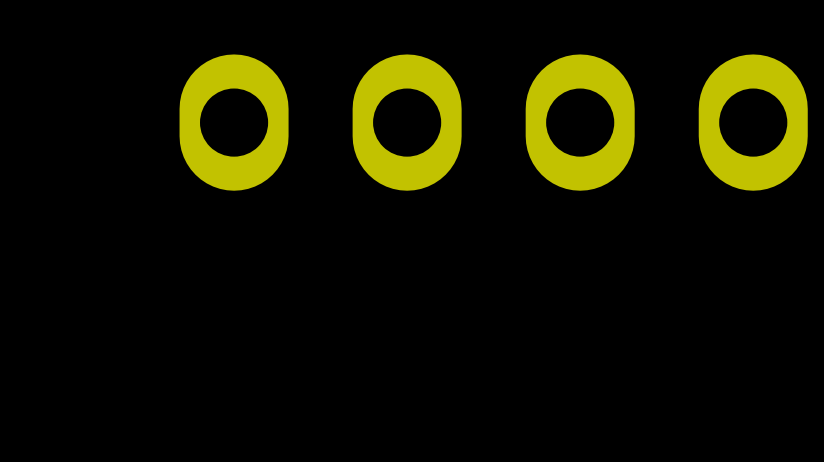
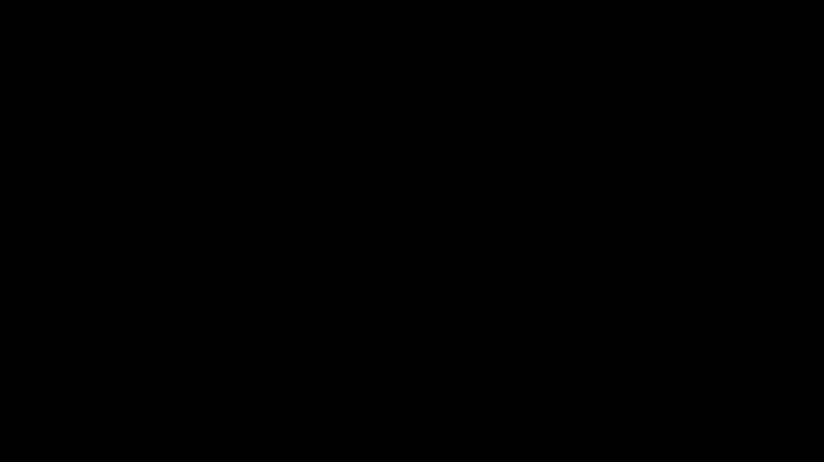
part: (493, 122) -> none

